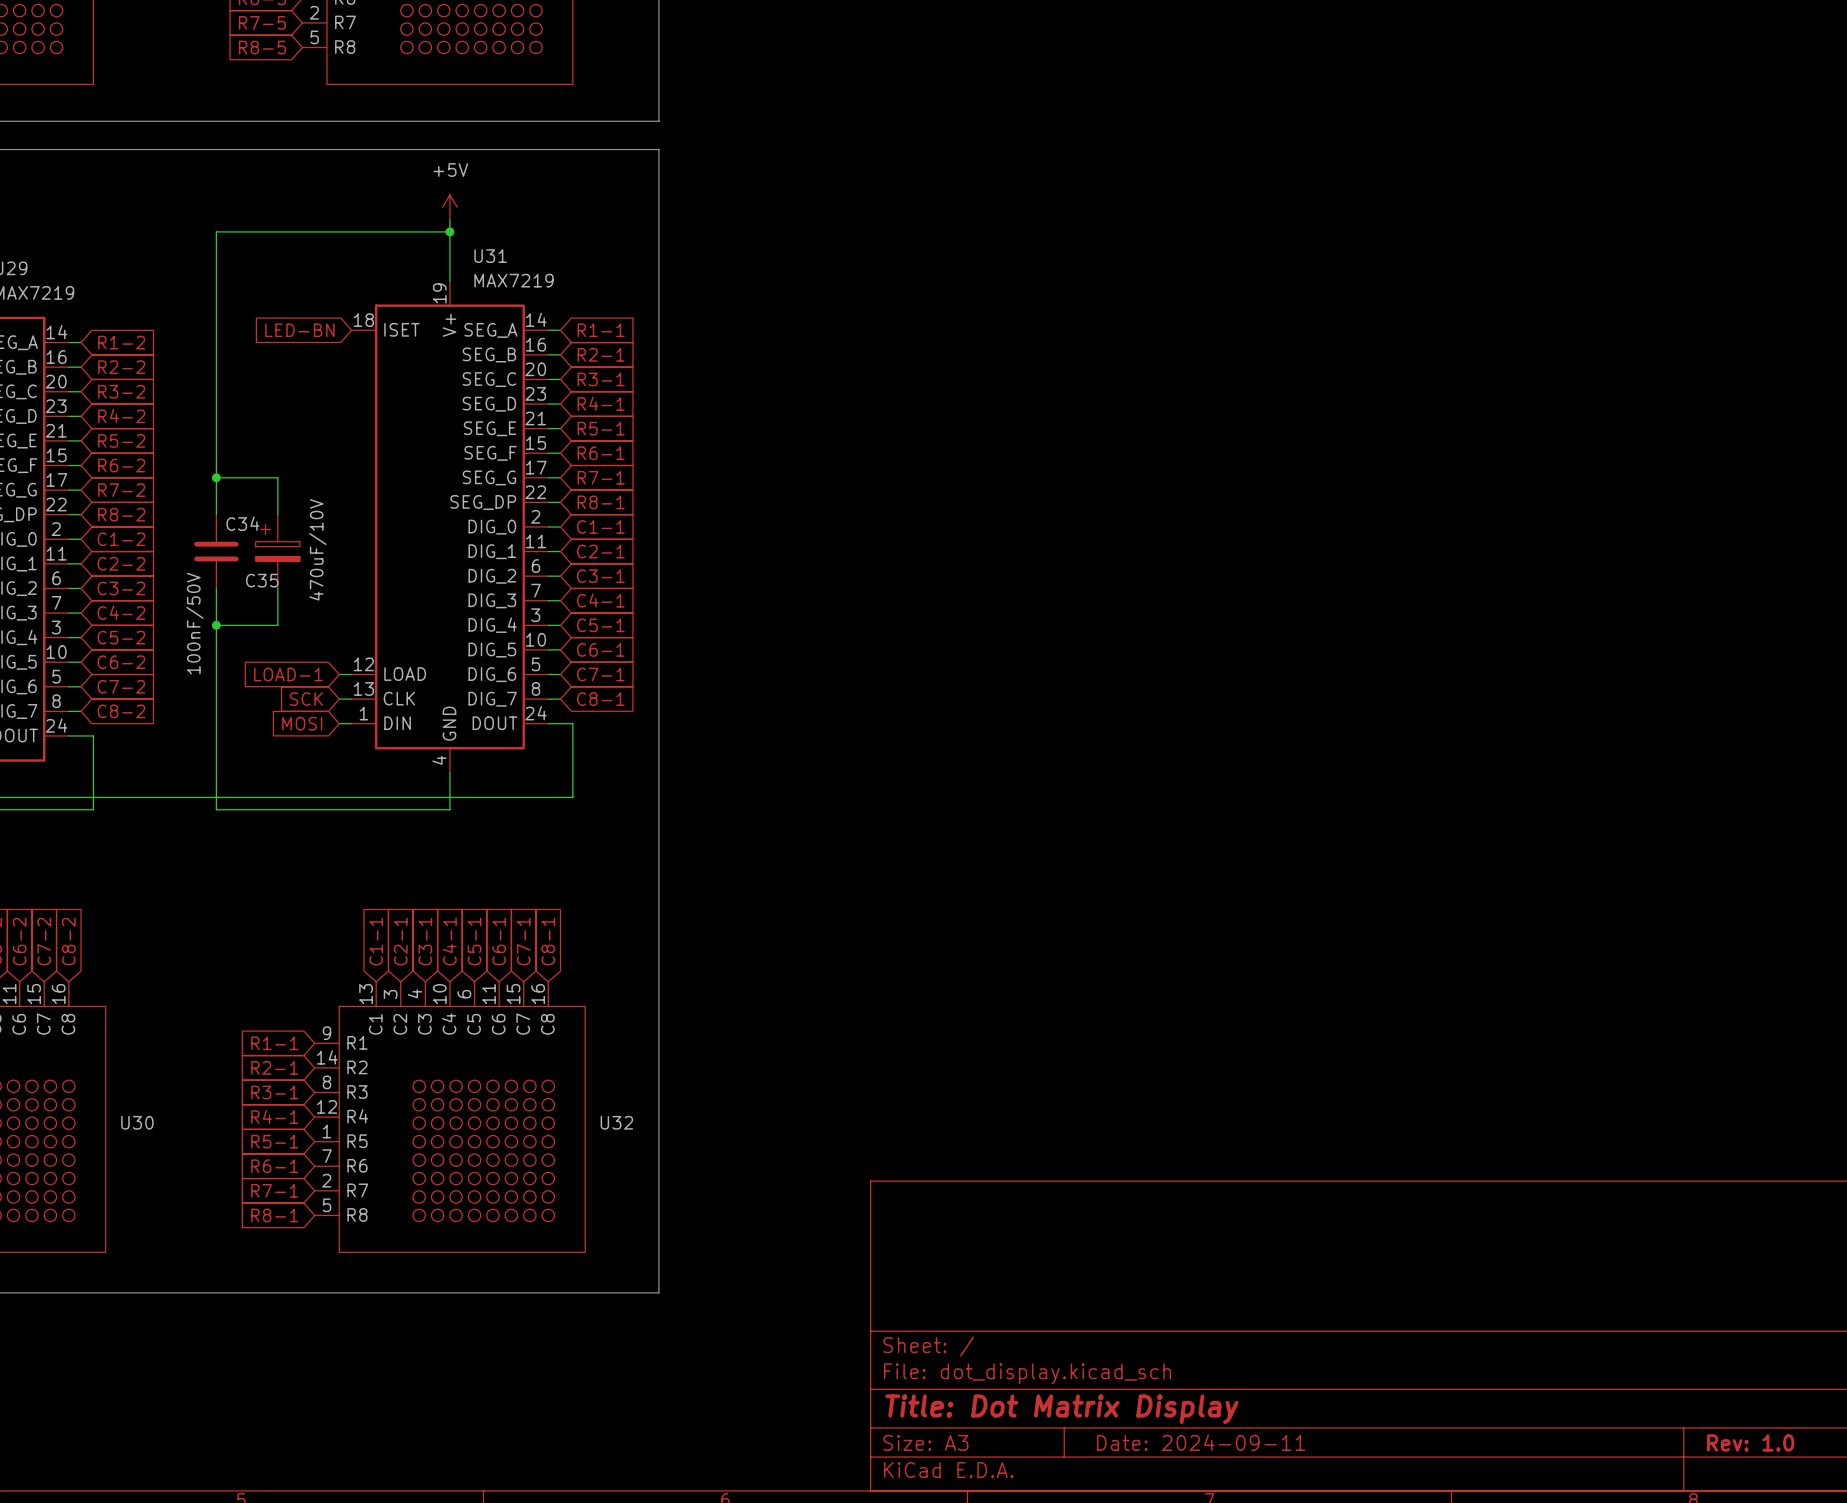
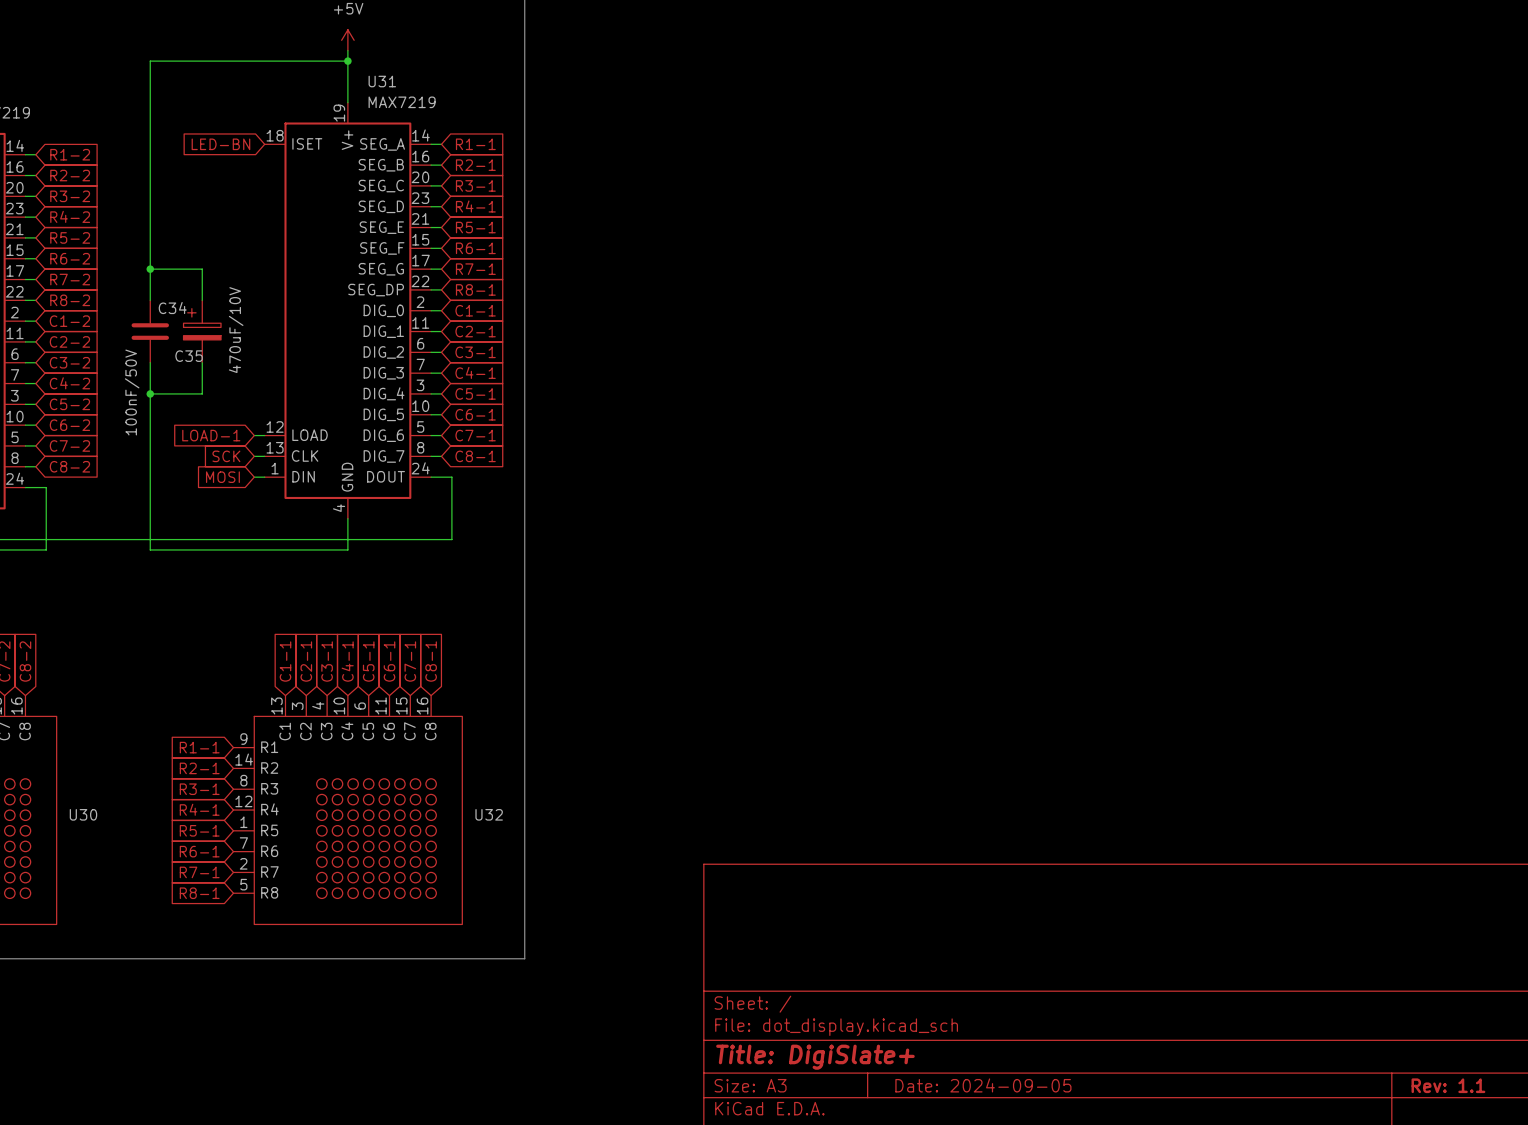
title block: Title: Dot Matrix Display (1061, 1409) -> Title: DigiSlate+ (815, 1057)
title block: Date: 2024-09-11 (1201, 1442) -> Date: 2024-09-05 (983, 1085)
title block: Rev: 1.0 (1750, 1442) -> Rev: 1.1 (1448, 1085)

